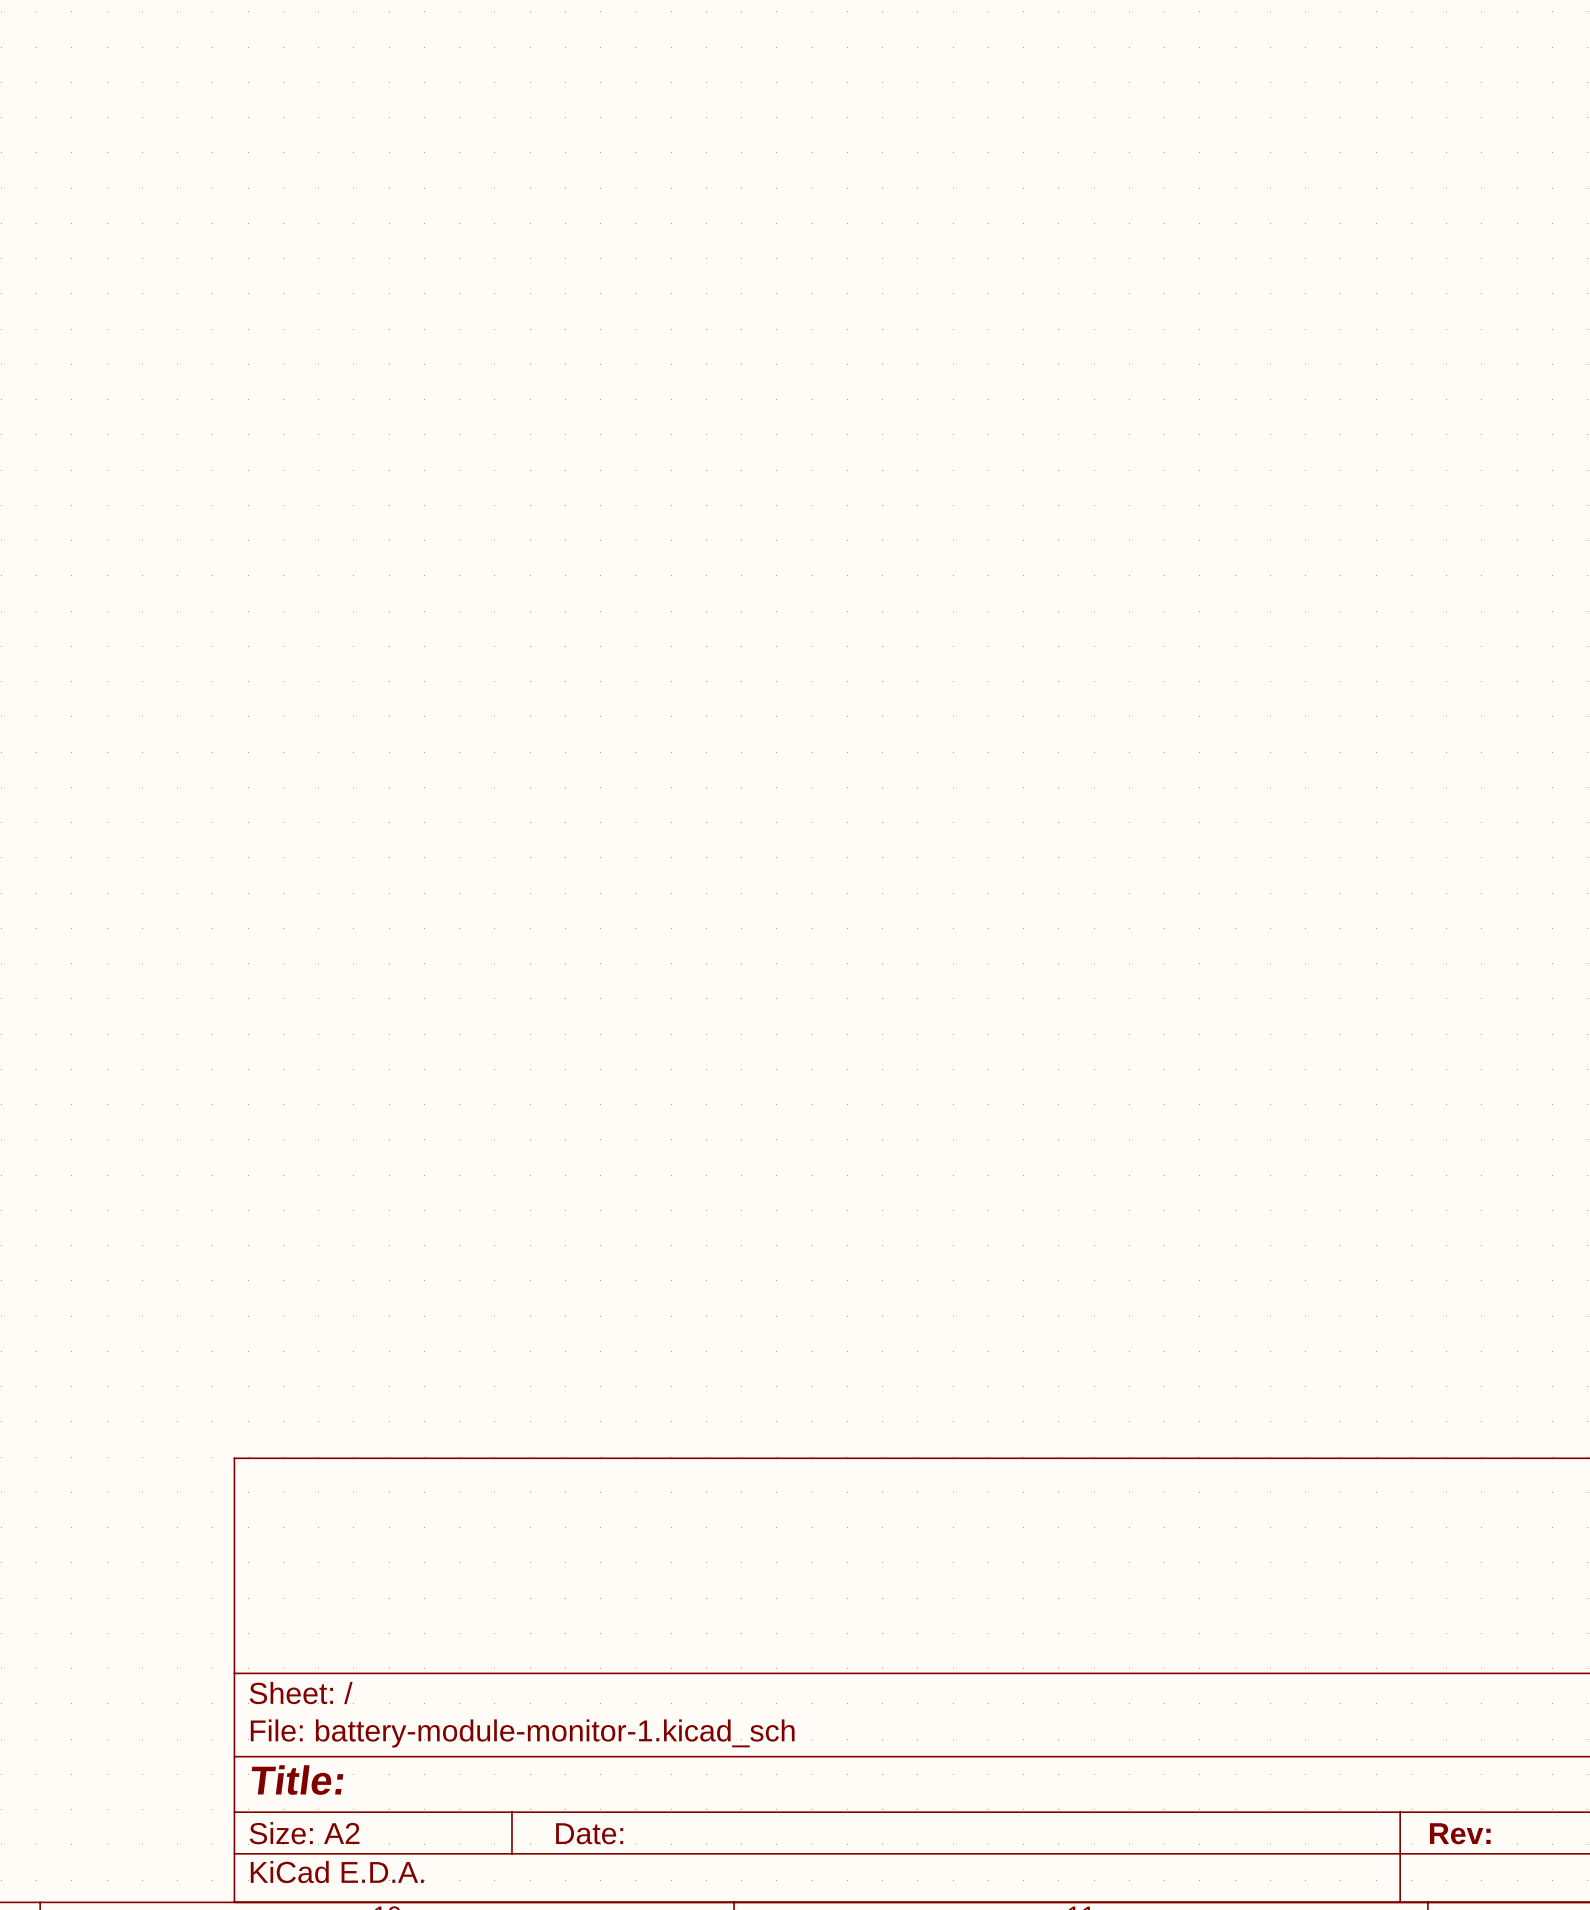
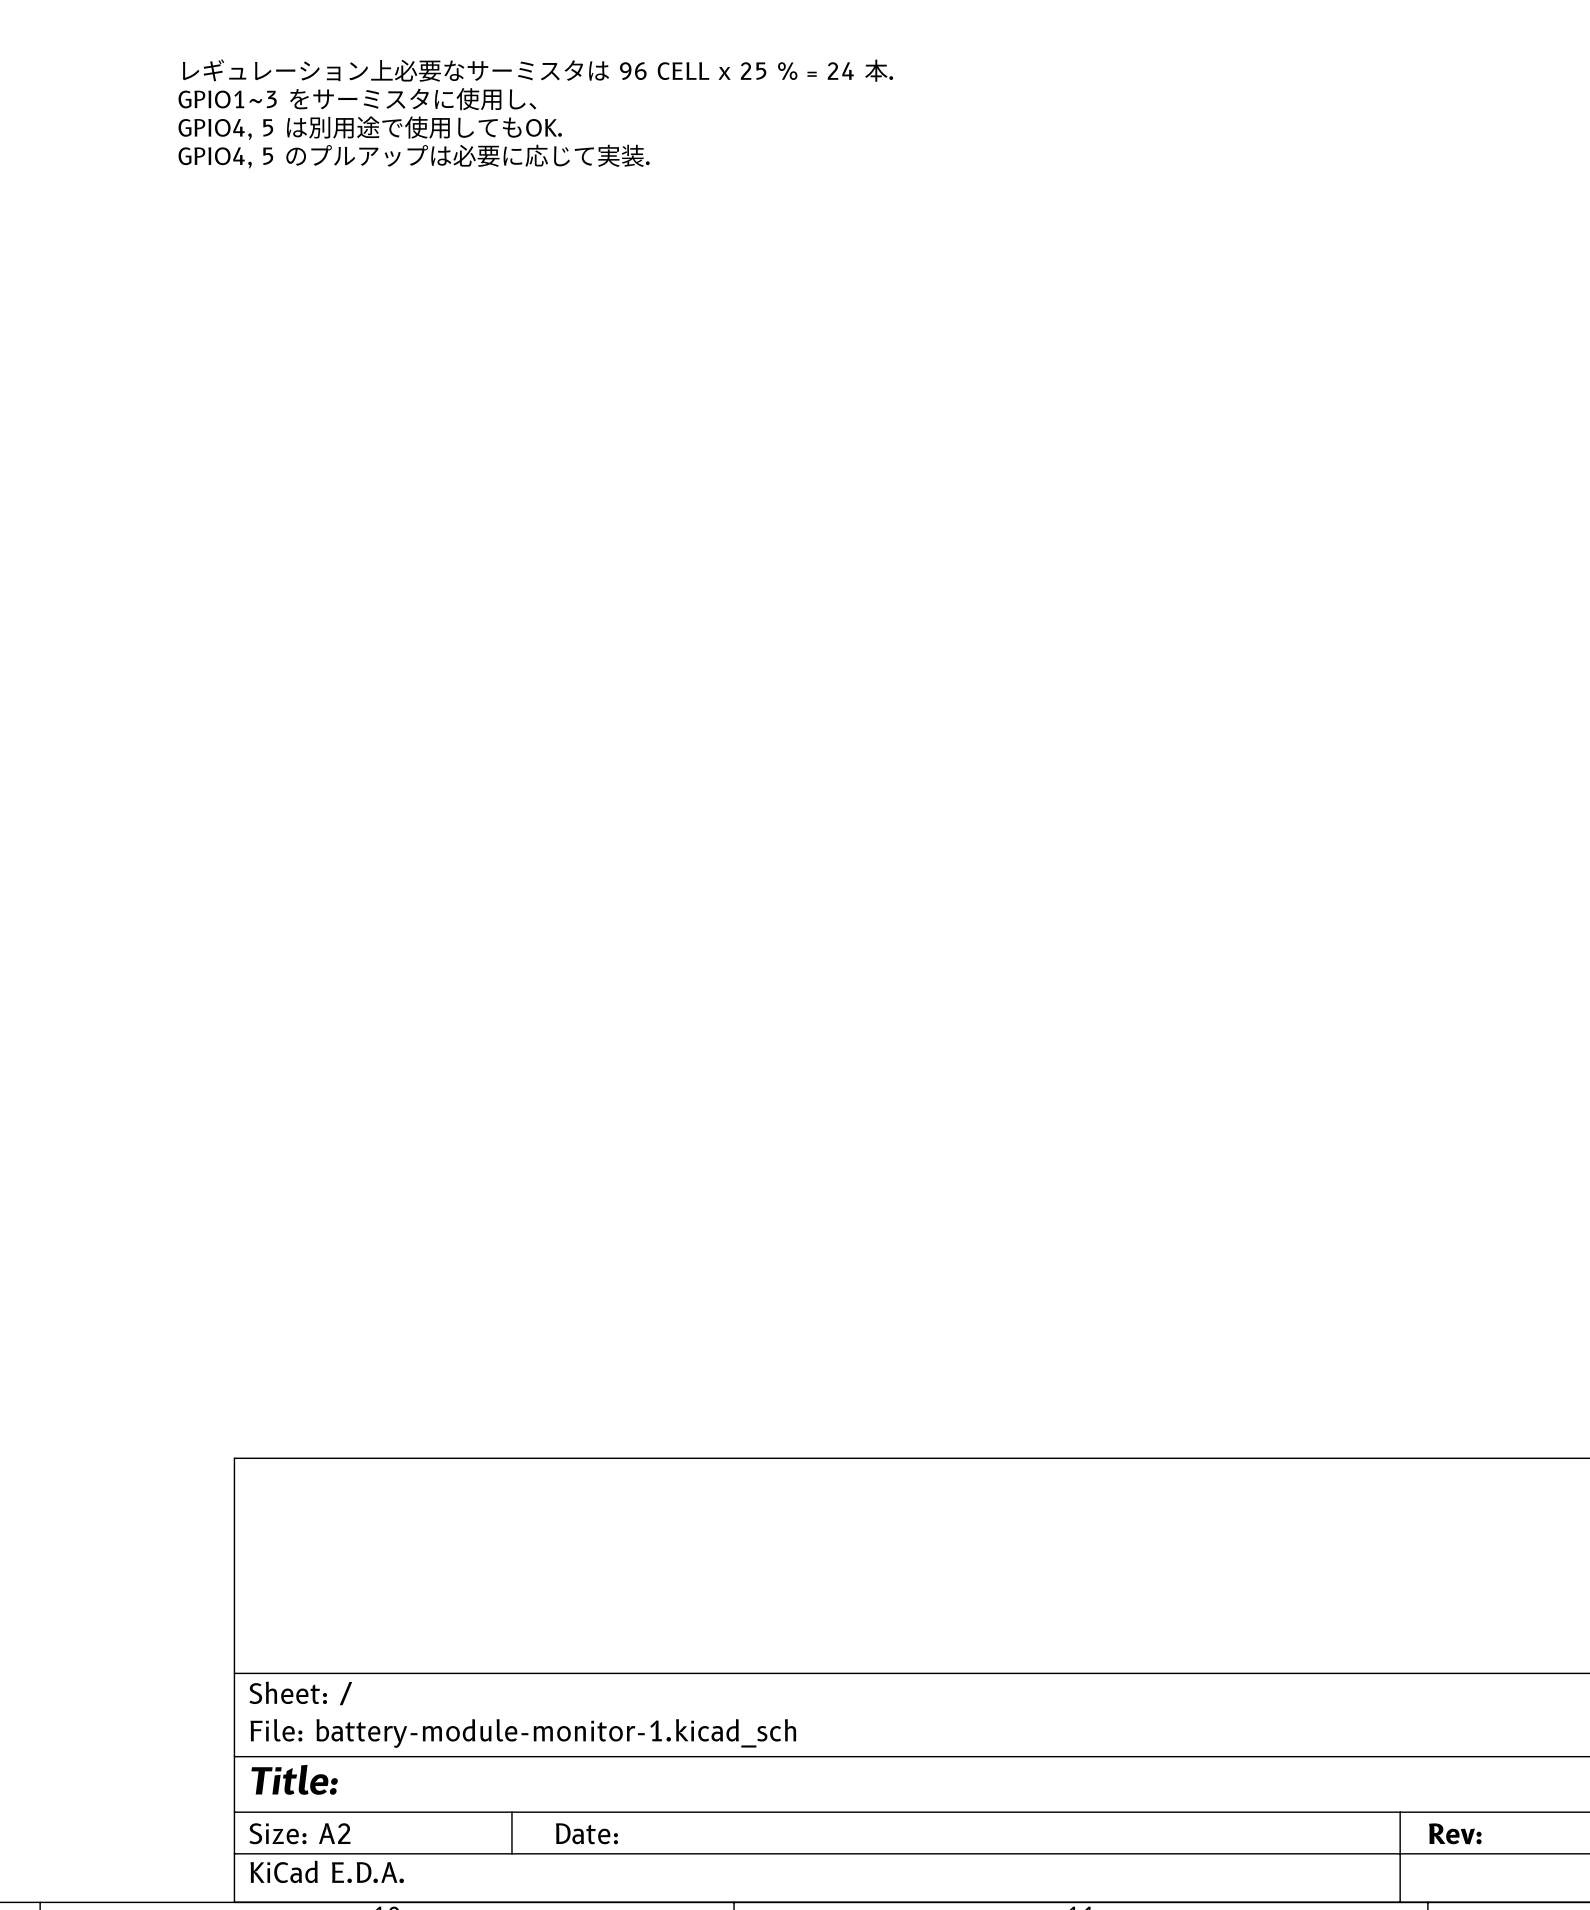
text: none -> レギュレーション上必要なサーミスタは 96 CELL x 25 % = 24 本. (538, 70)
text: none -> GPIO1~3 をサーミスタに使用し、 (357, 99)
text: none -> GPIO4, 5 は別用途で使用してもOK. (370, 128)
text: none -> GPIO4, 5 のプルアップは必要に応じて実装. (414, 156)

